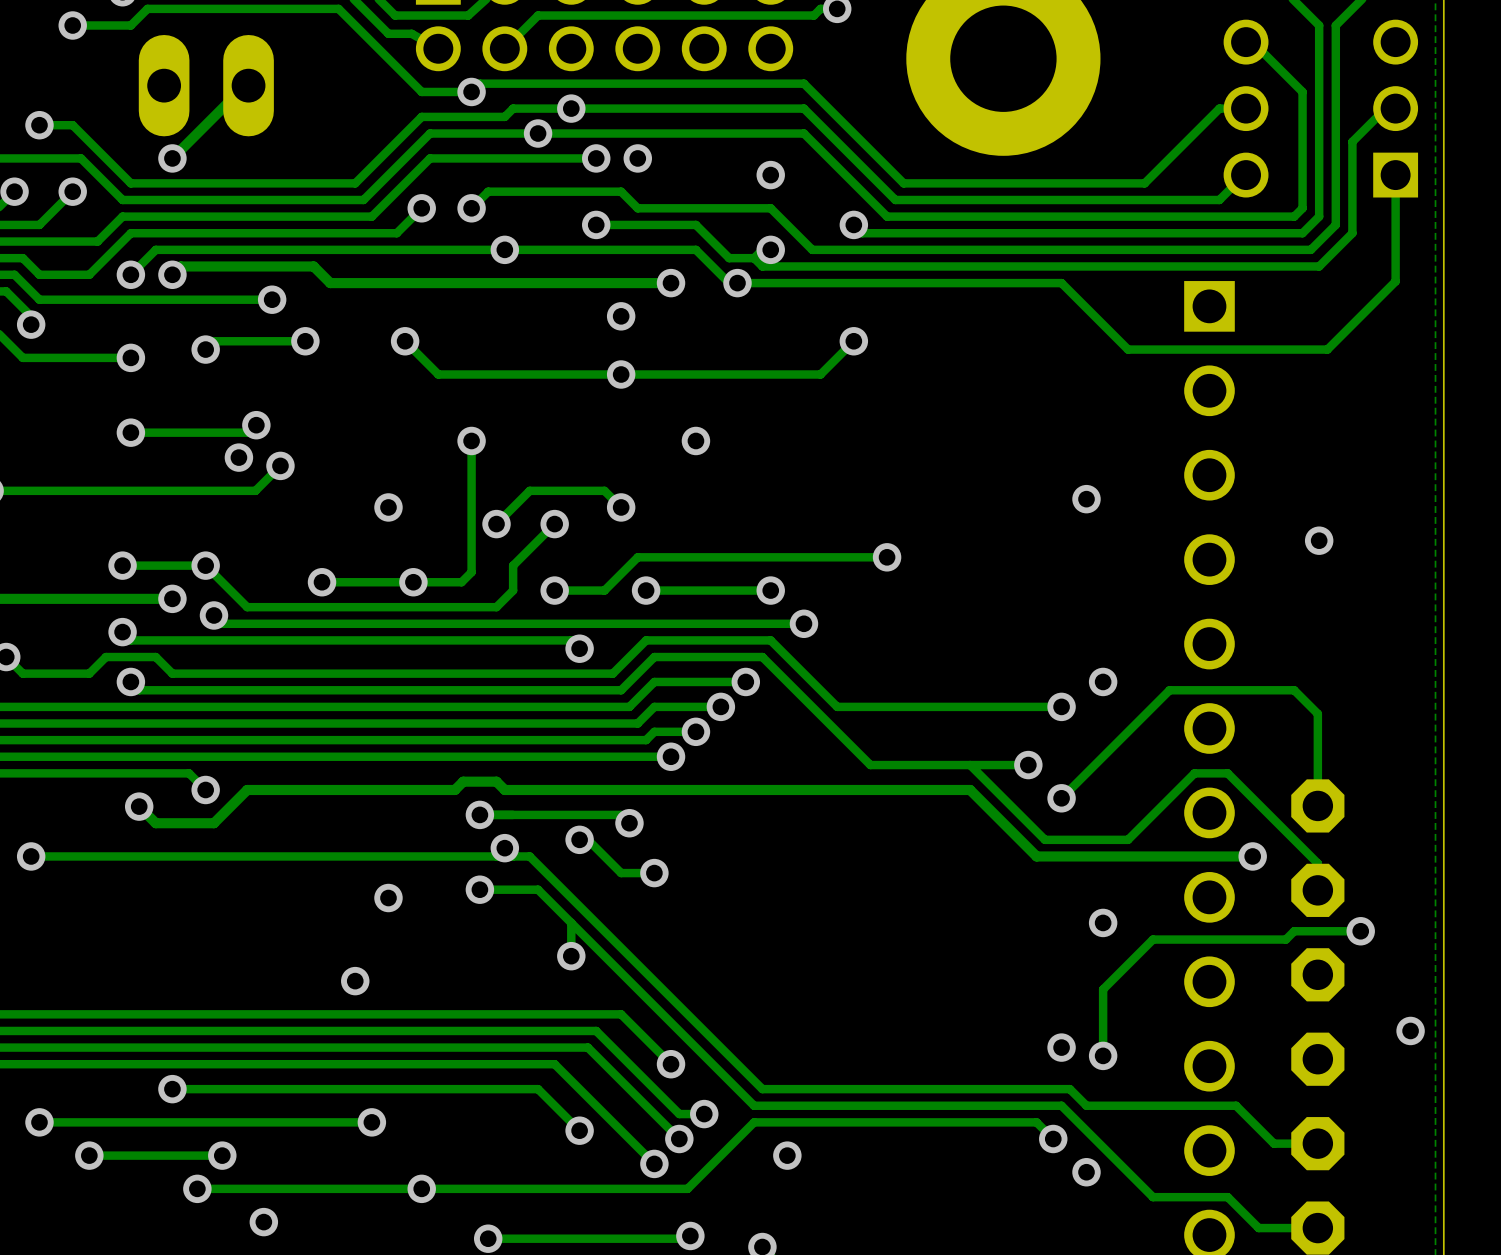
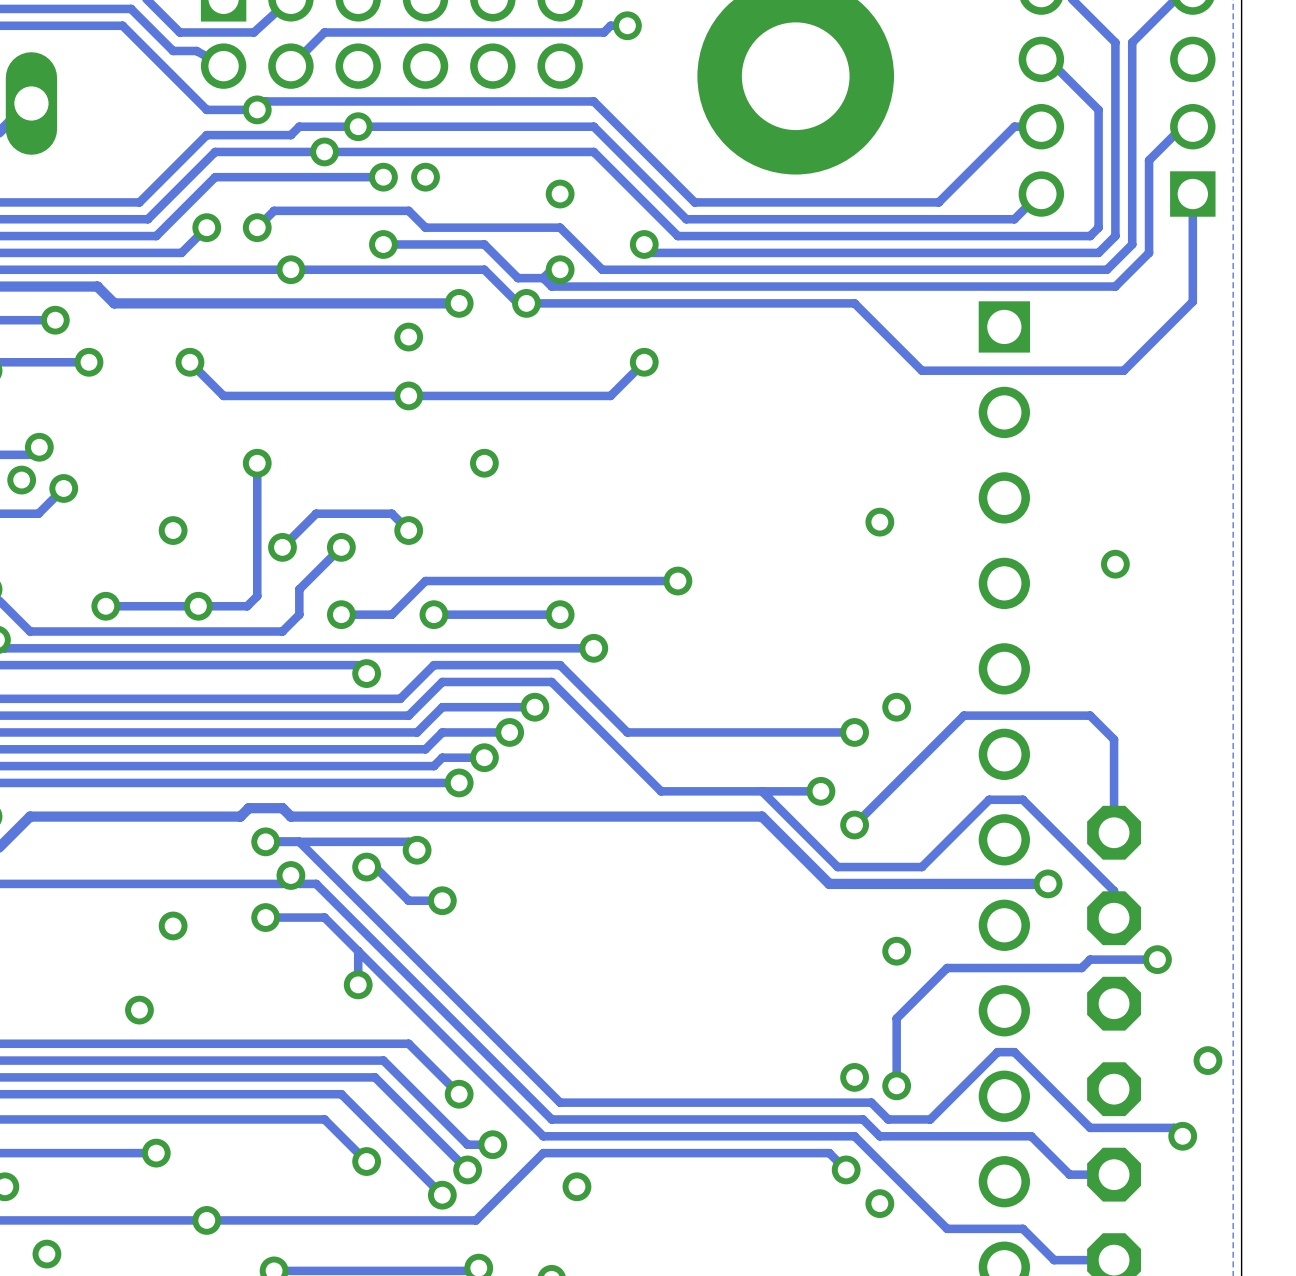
track: none -> (299, 841) (560, 1102) (871, 1102) (888, 1119) (930, 1119) (997, 1052) (1014, 1052) (1090, 1127) (1174, 1127) (1182, 1136)
via: none -> (1182, 1136)

